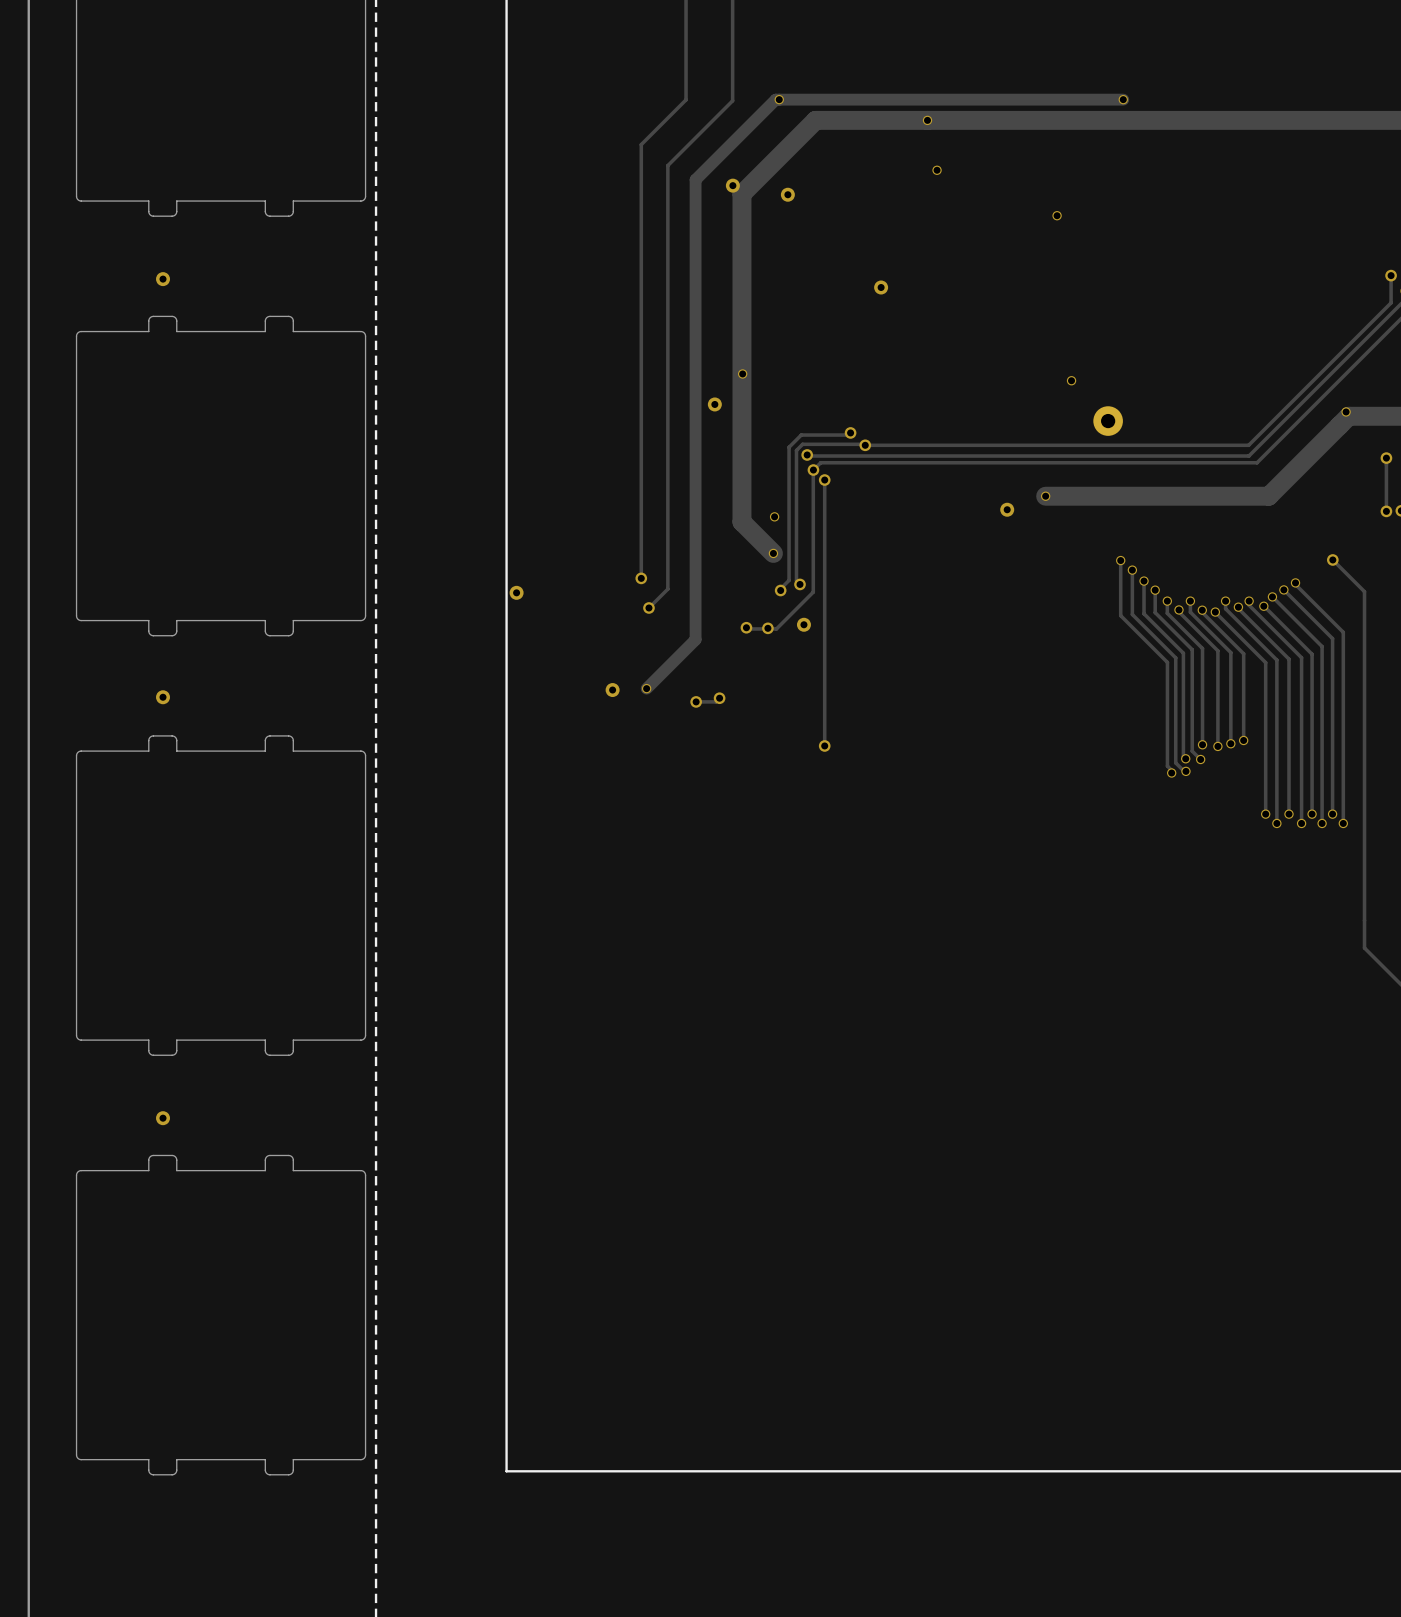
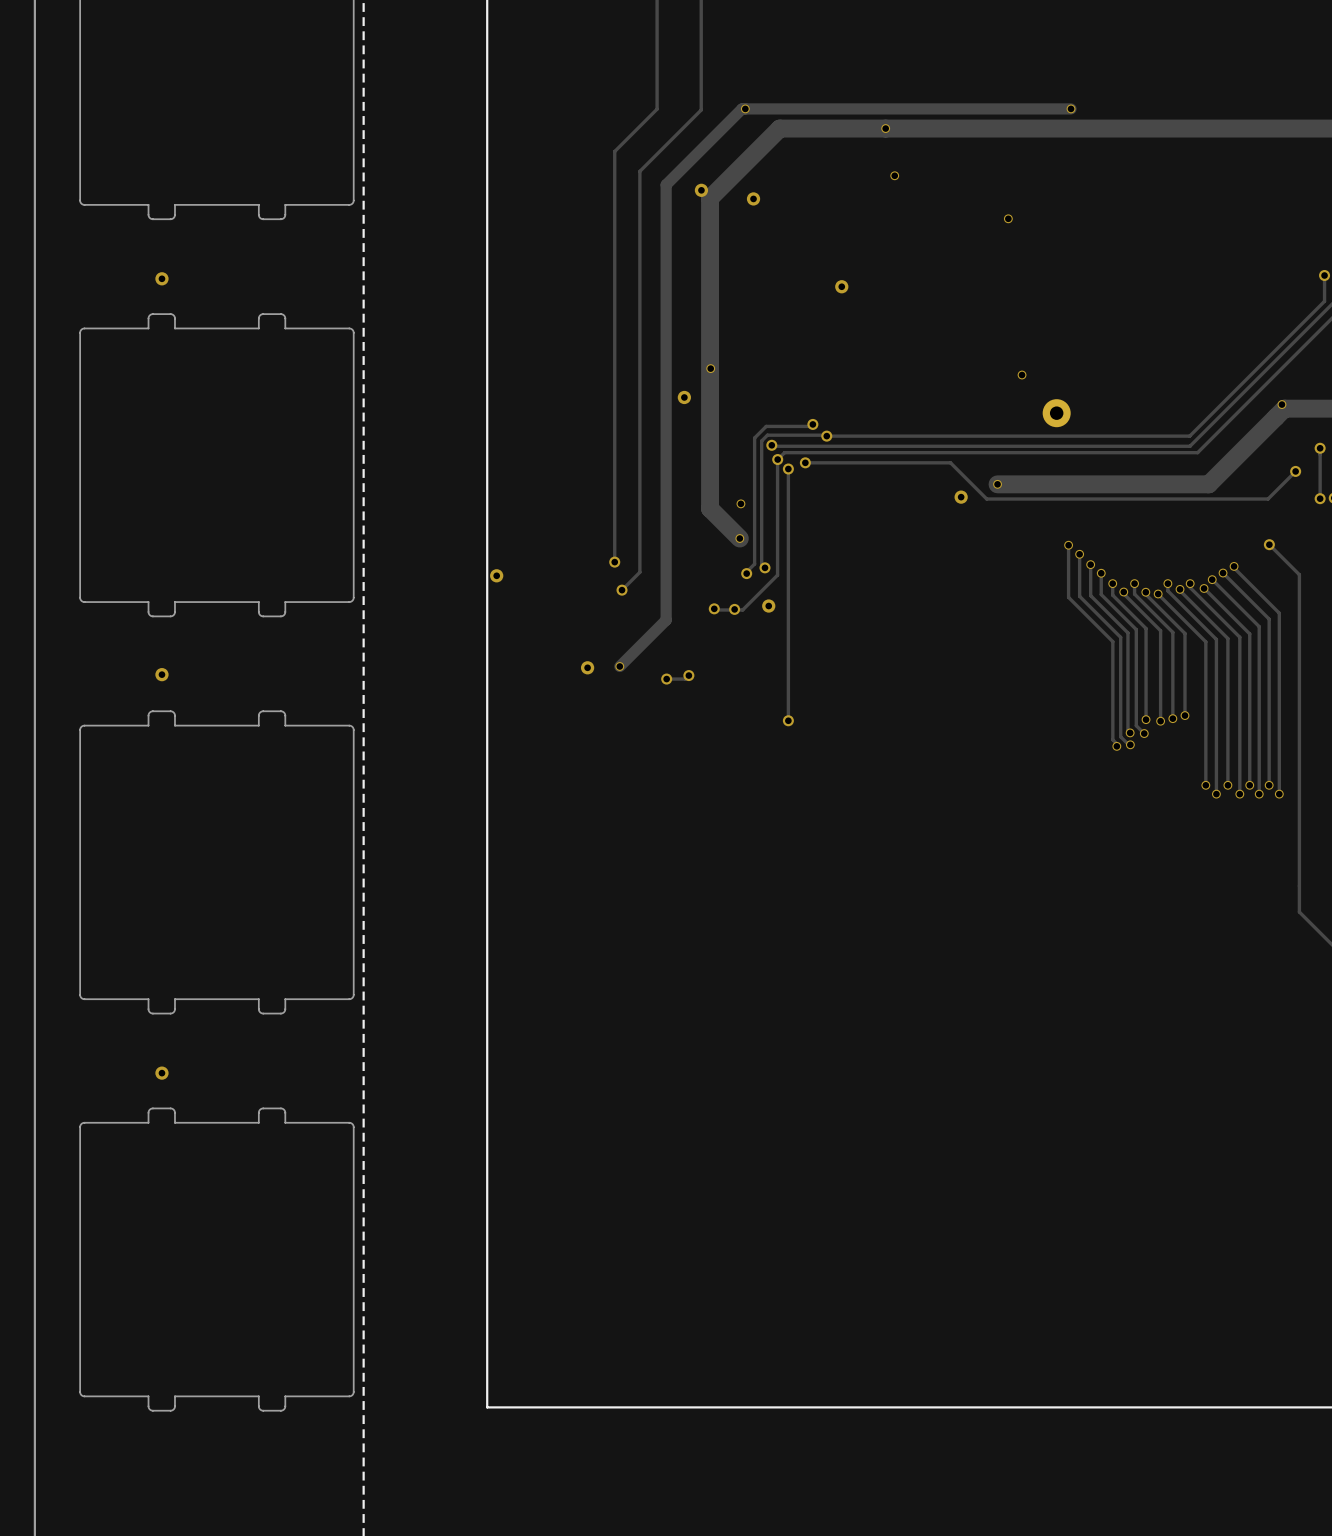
track: none -> (805, 462) (950, 462) (986, 499) (1268, 499) (1295, 471)
via: none -> (805, 462)
via: none -> (1295, 471)

